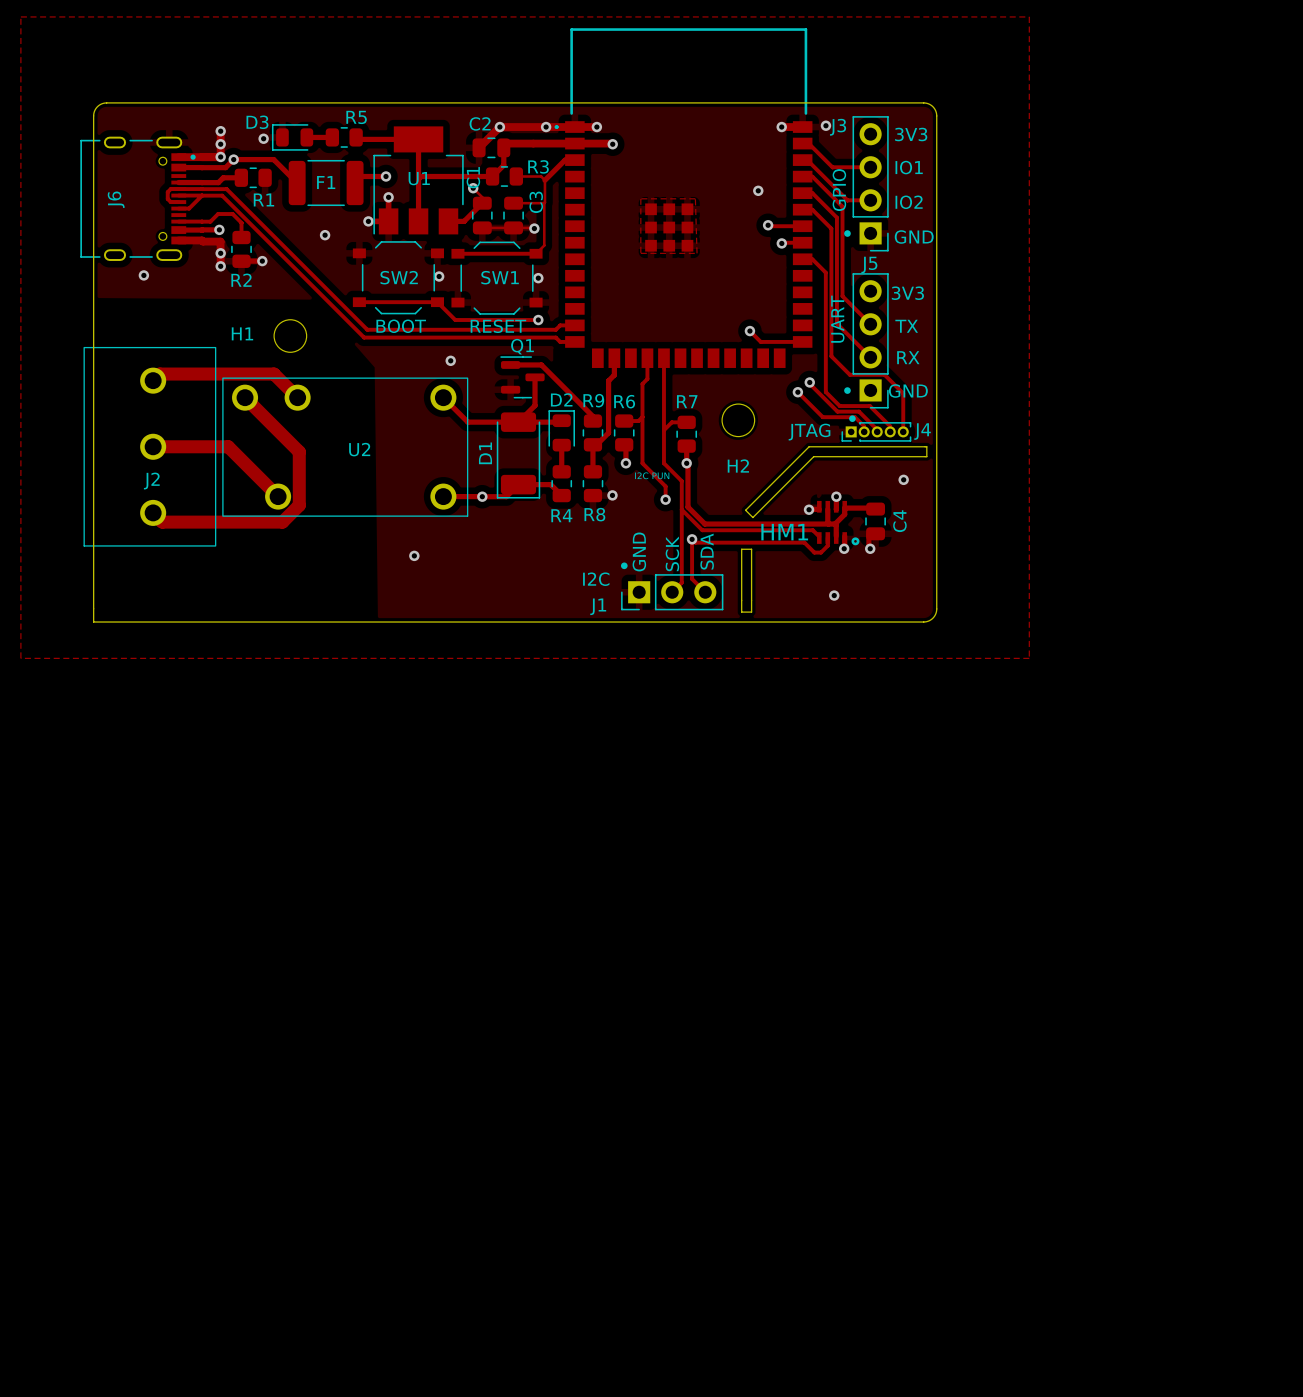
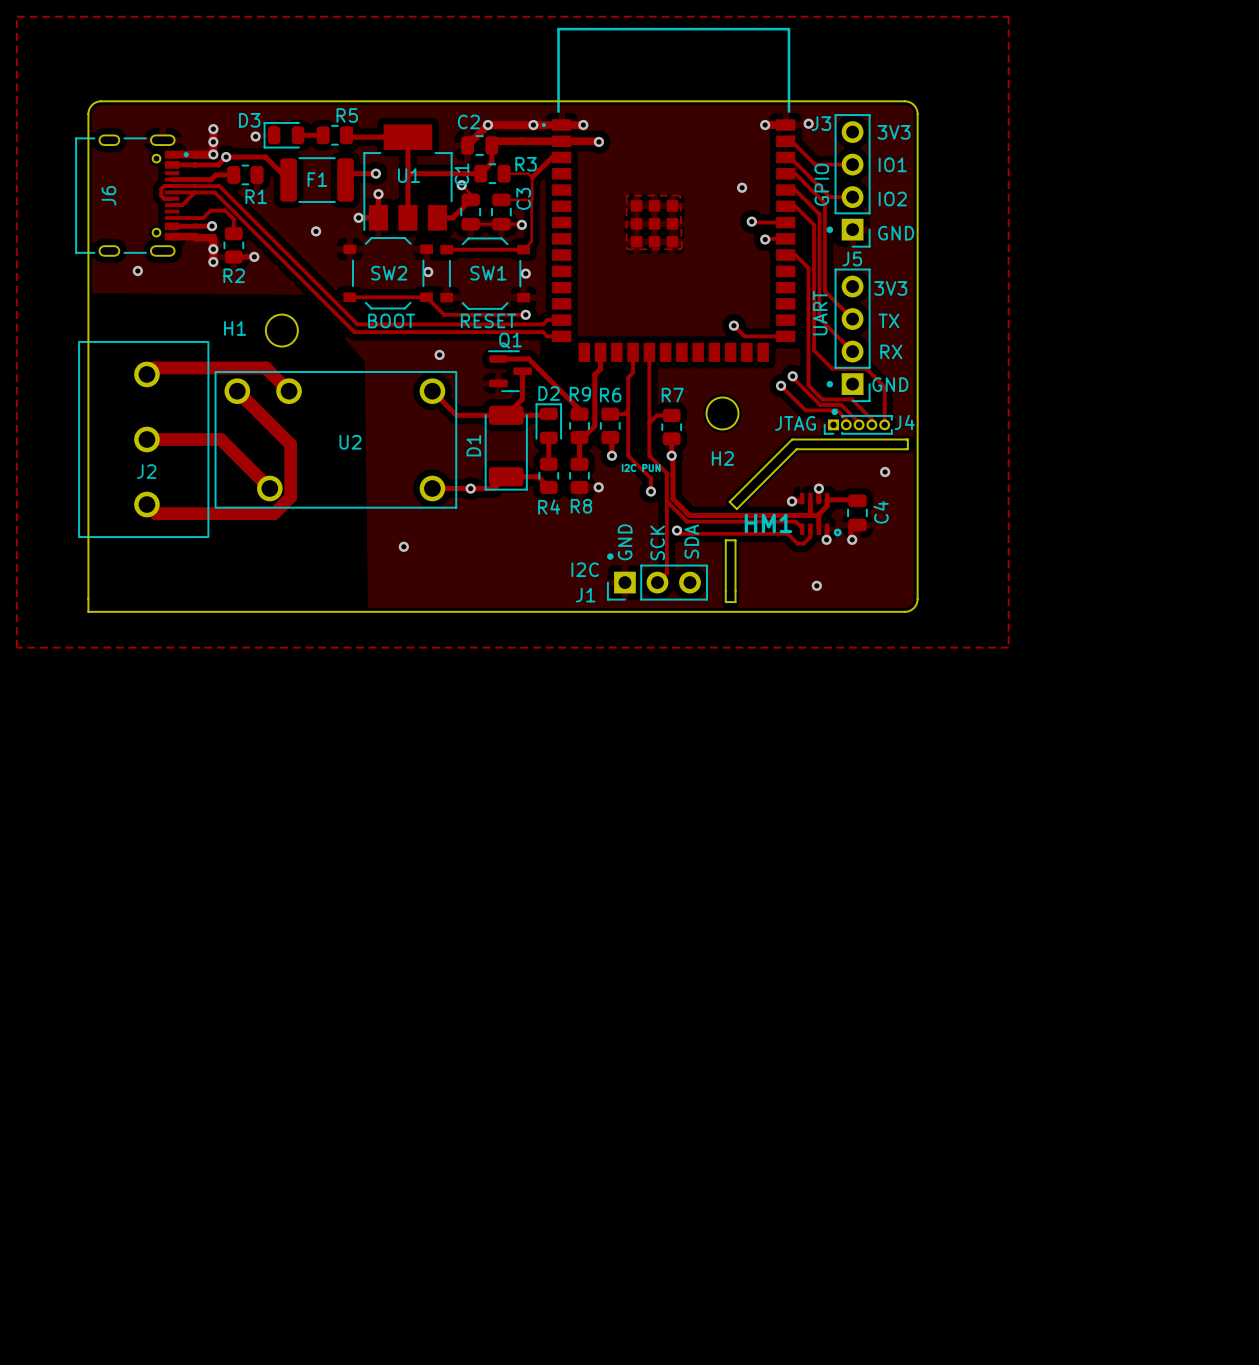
track: (692, 539) (692, 579) (705, 592) -> none

